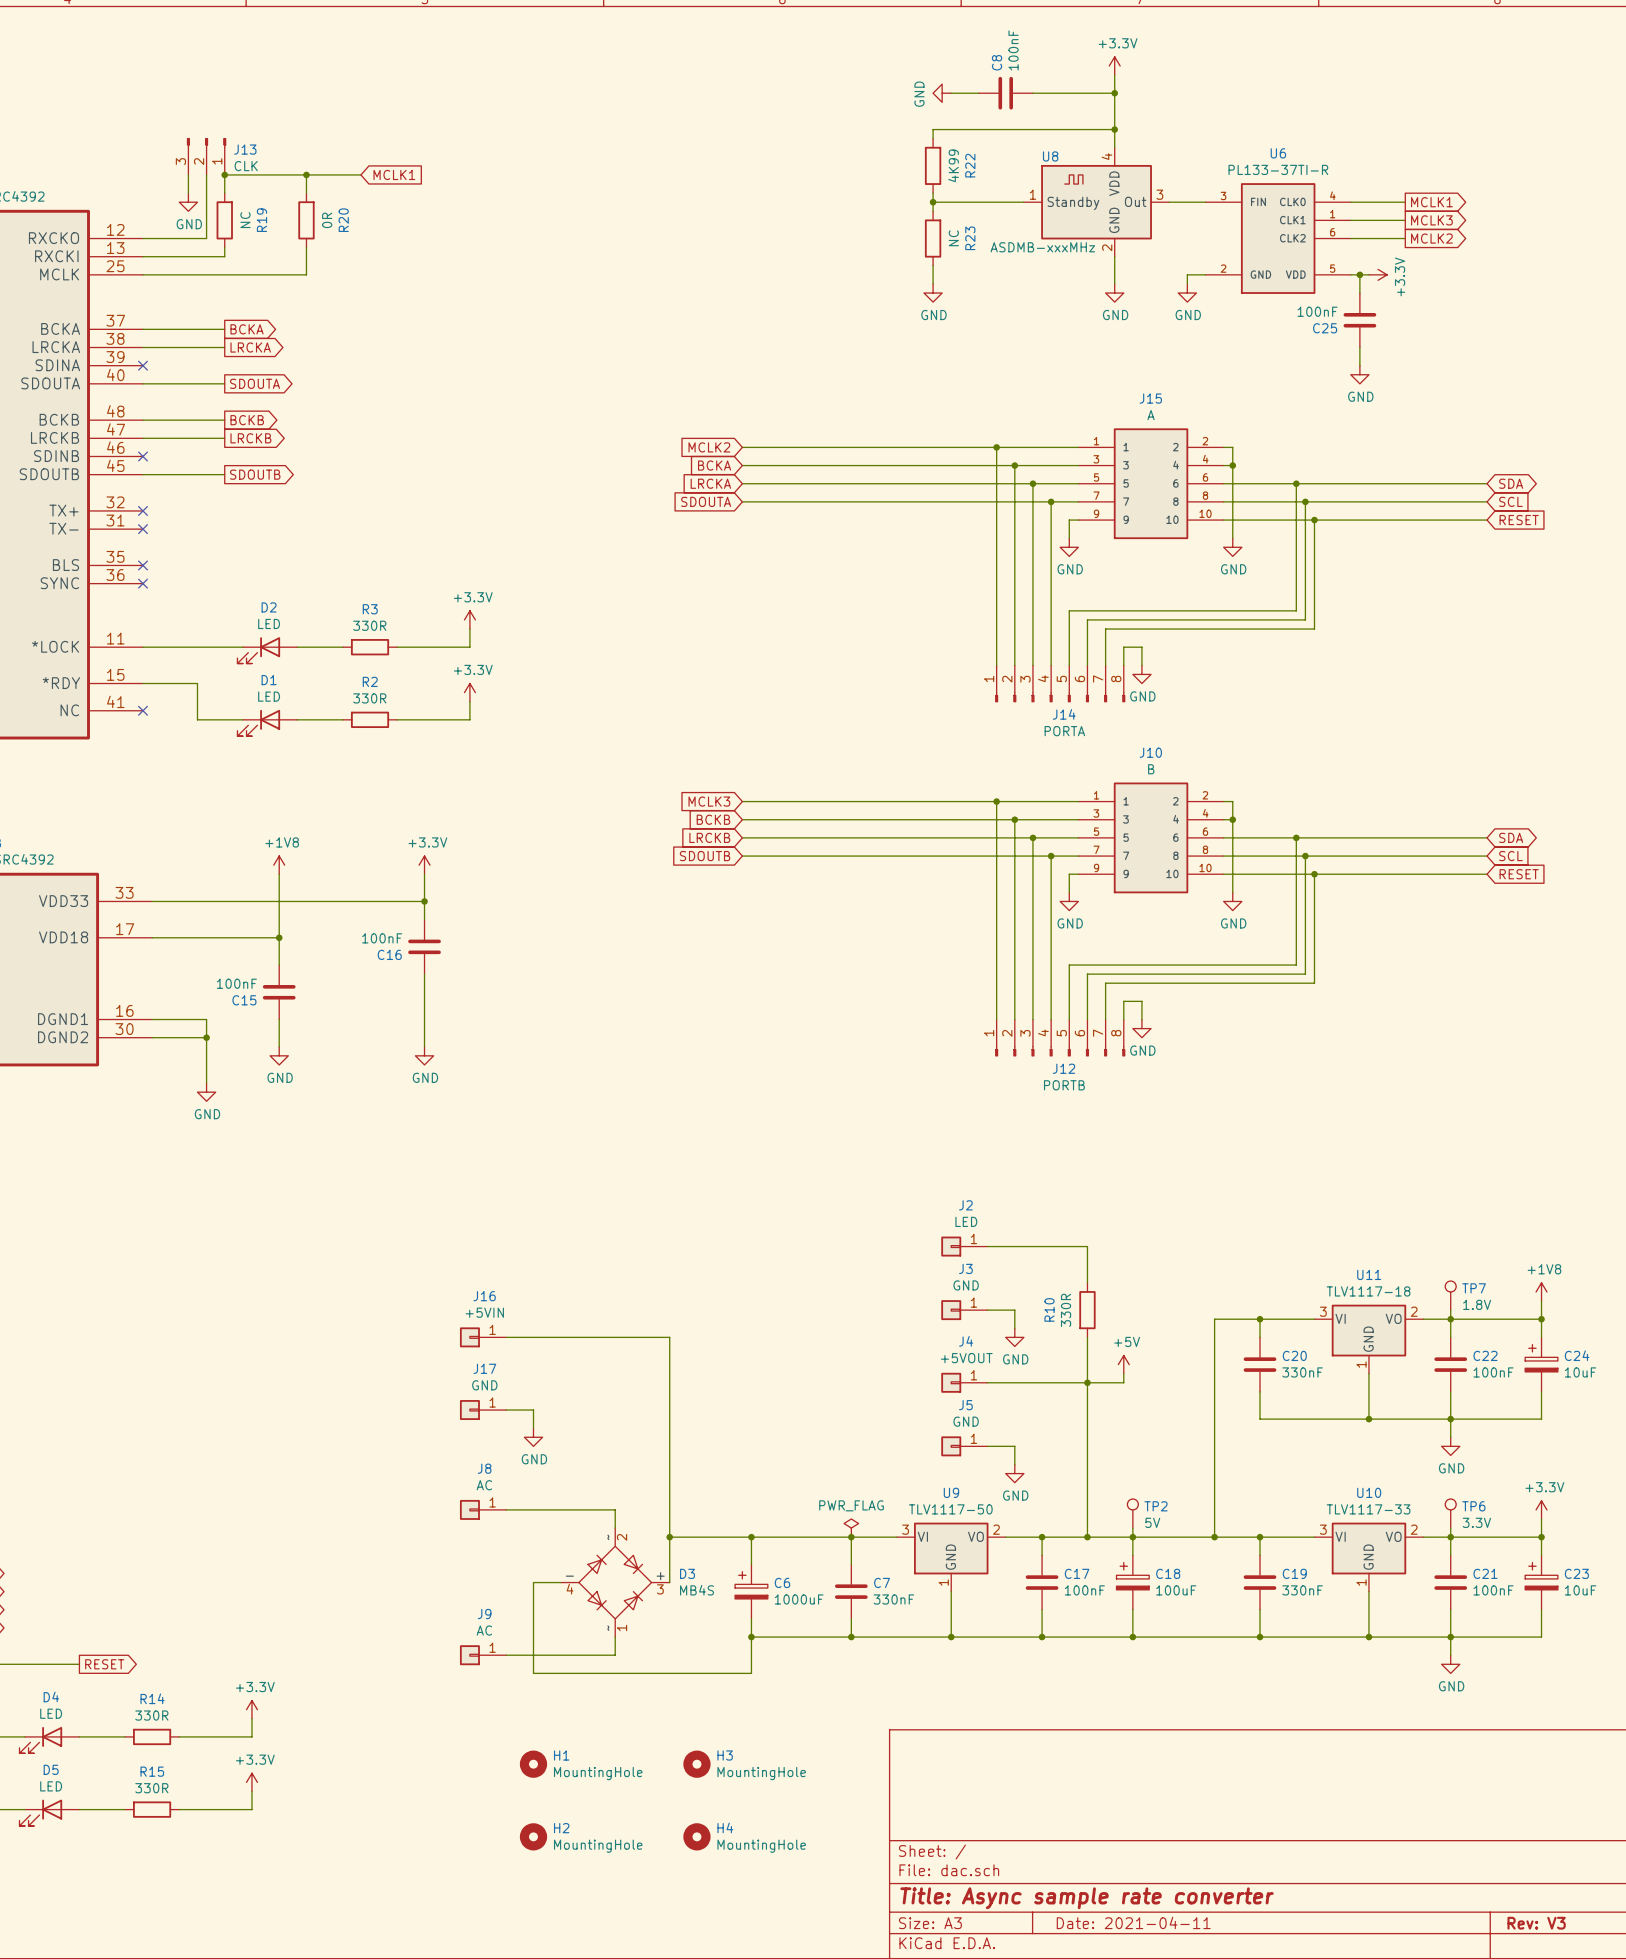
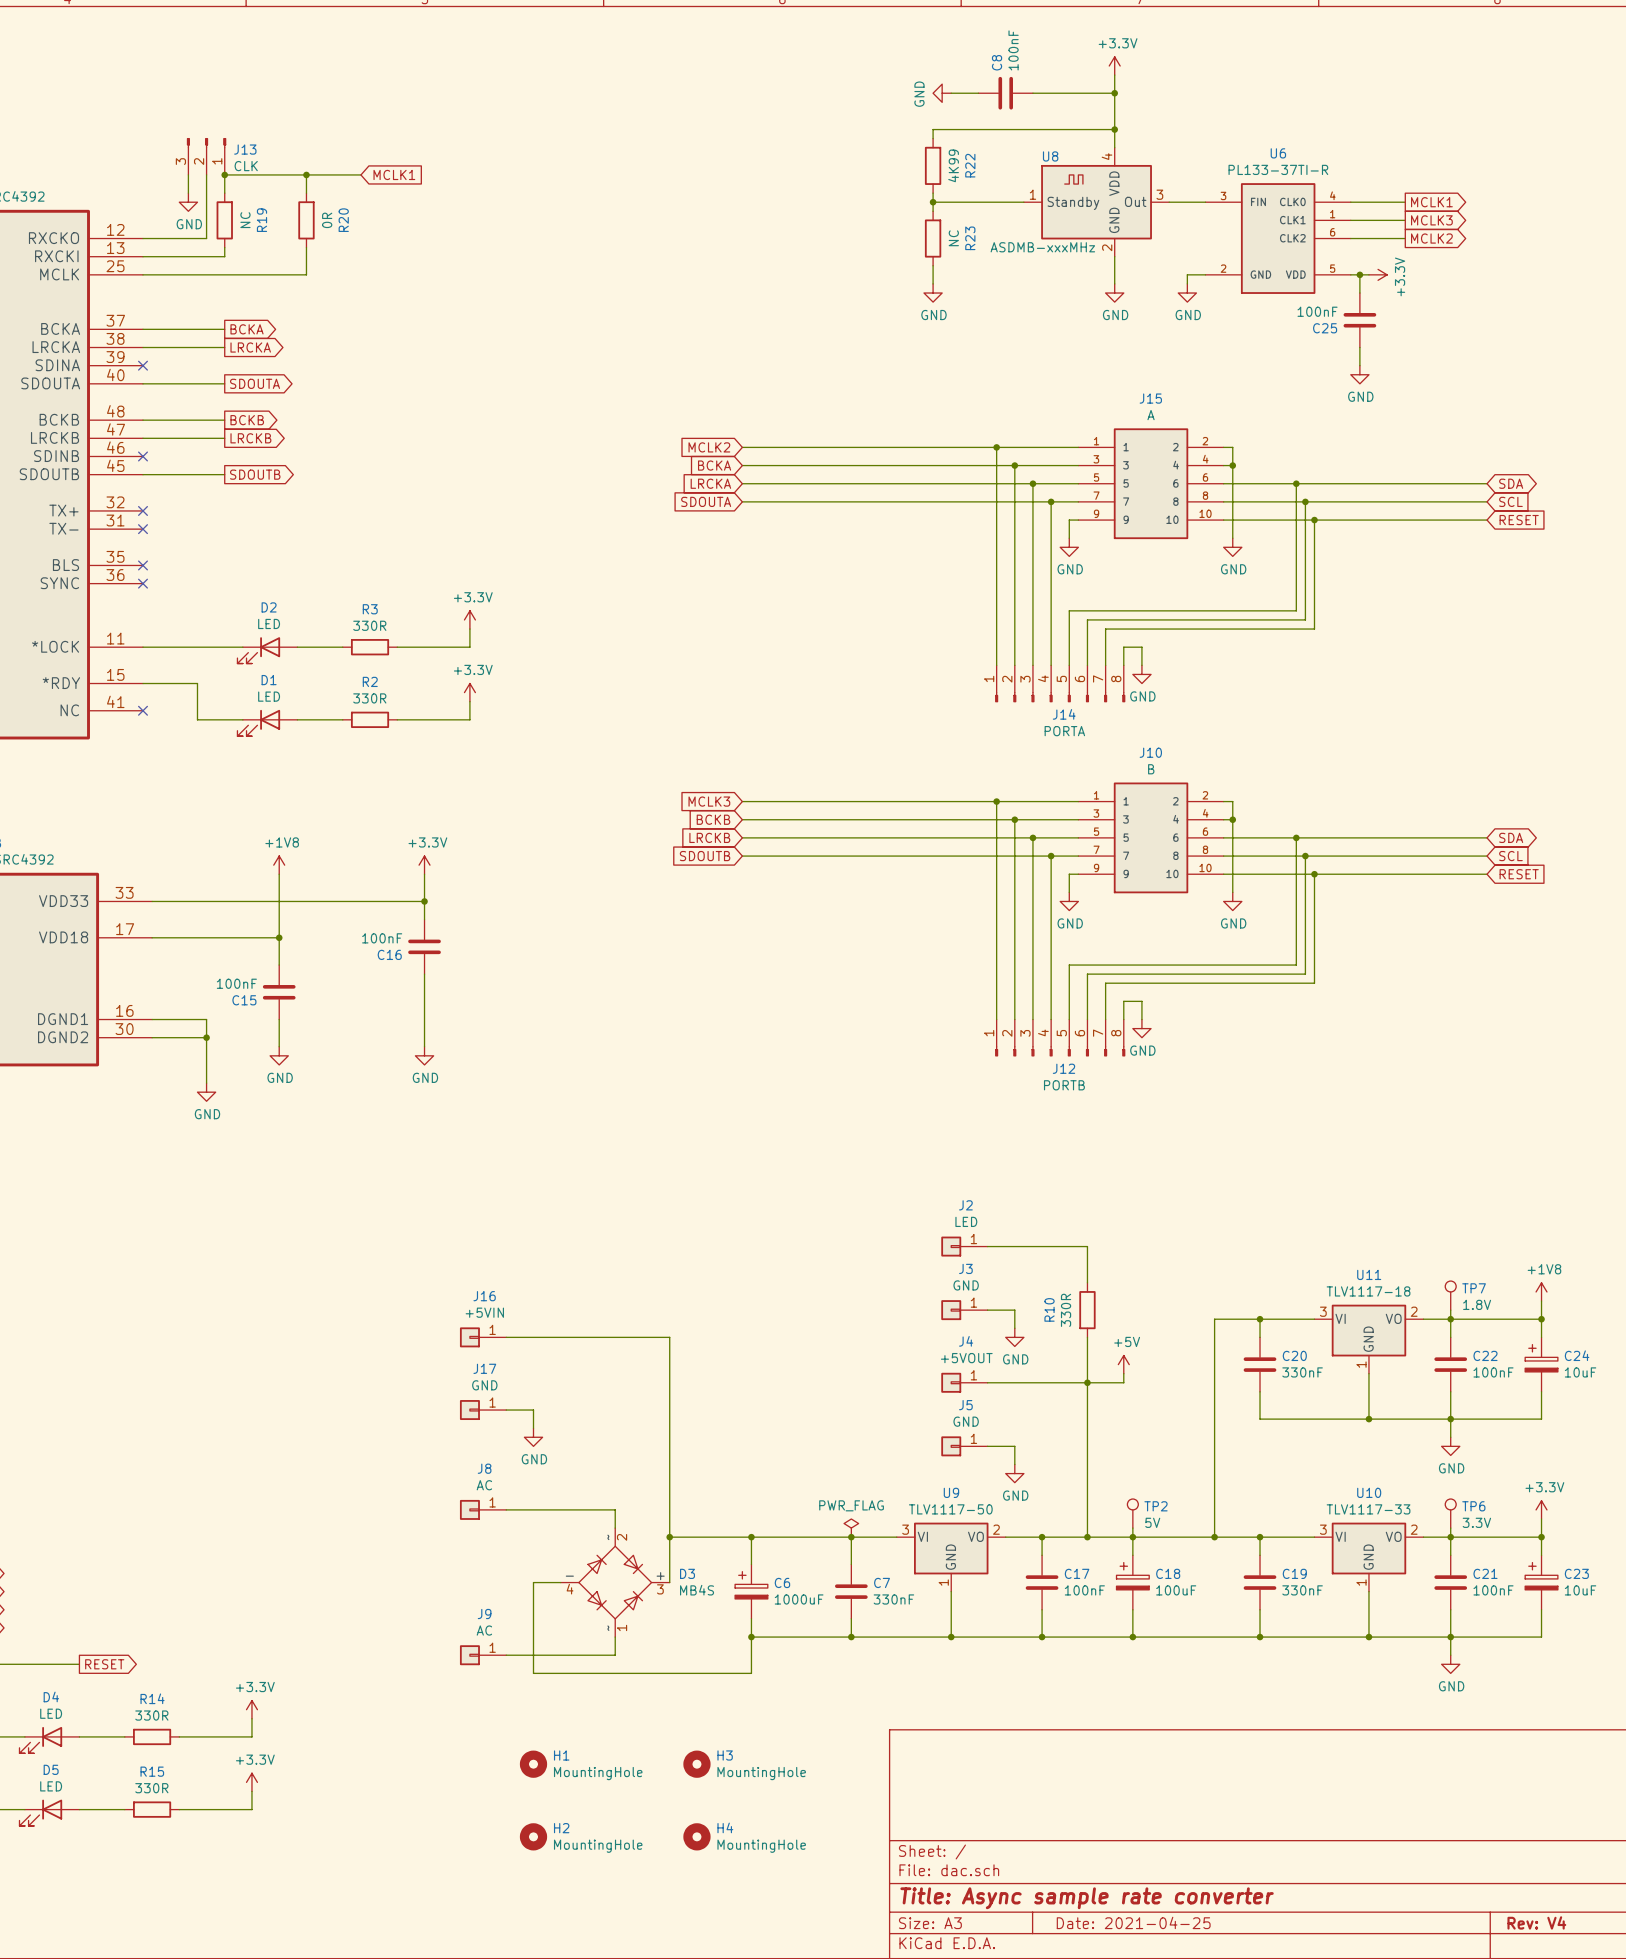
title block: Date: 2021-04-11 (1133, 1922) -> Date: 2021-04-25 (1133, 1922)
title block: Rev: V3 (1536, 1923) -> Rev: V4 (1536, 1922)

